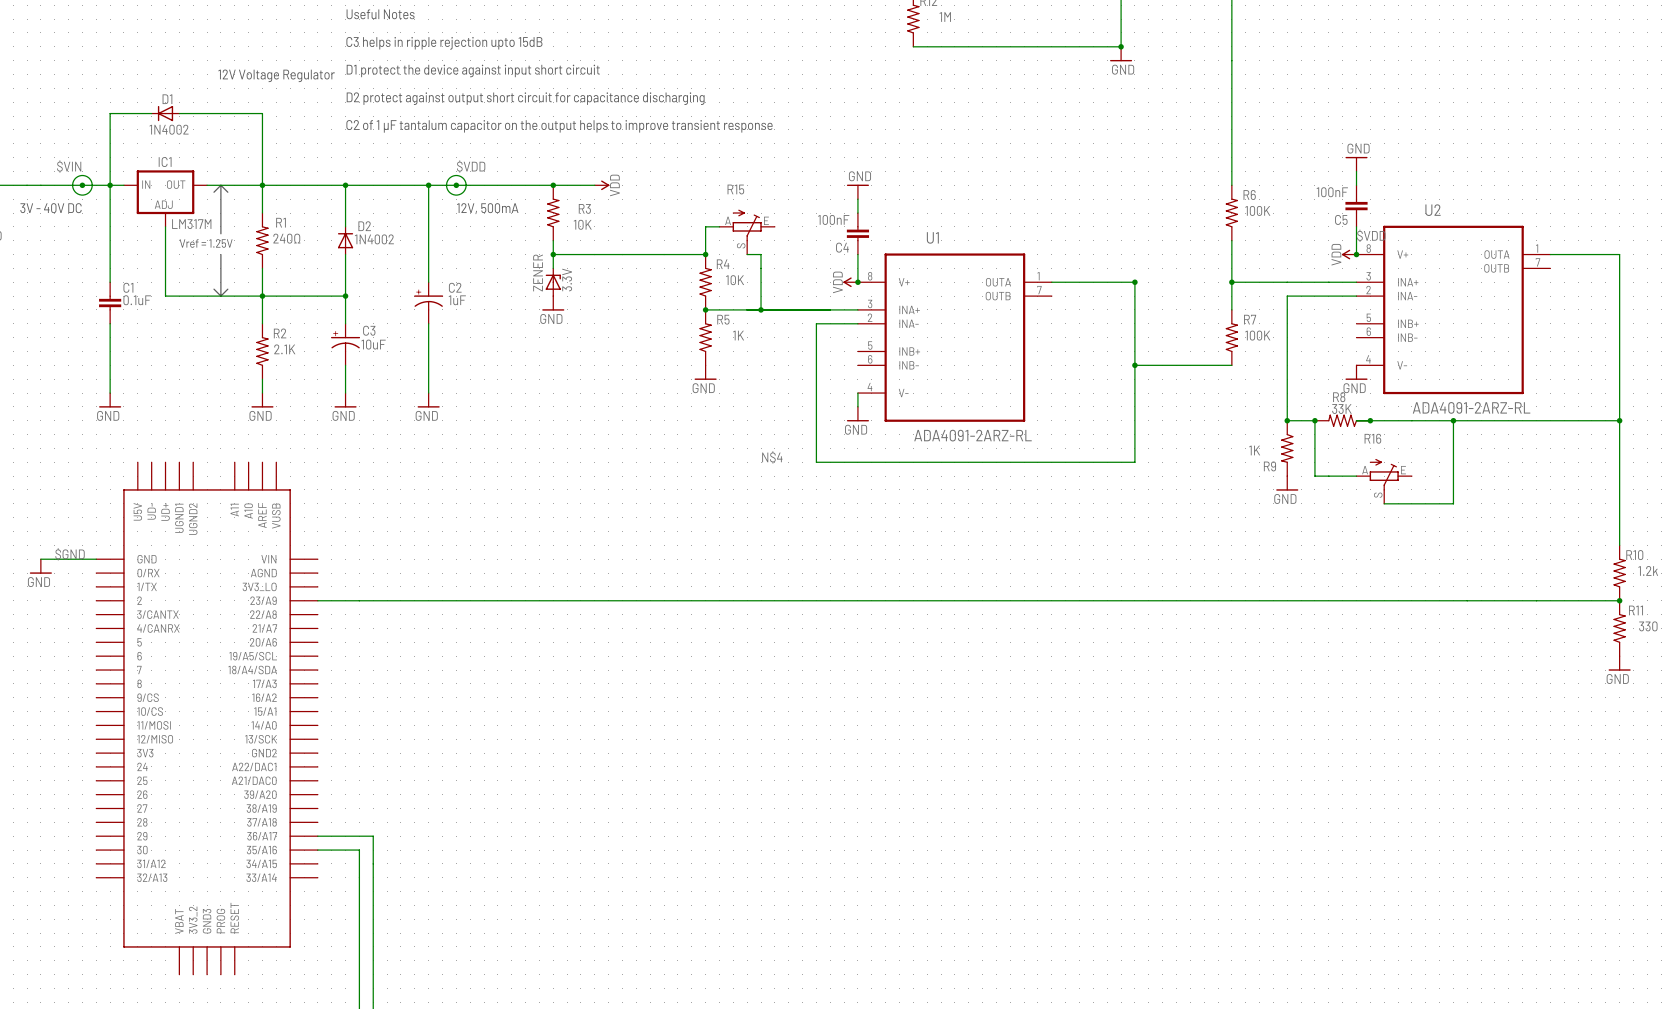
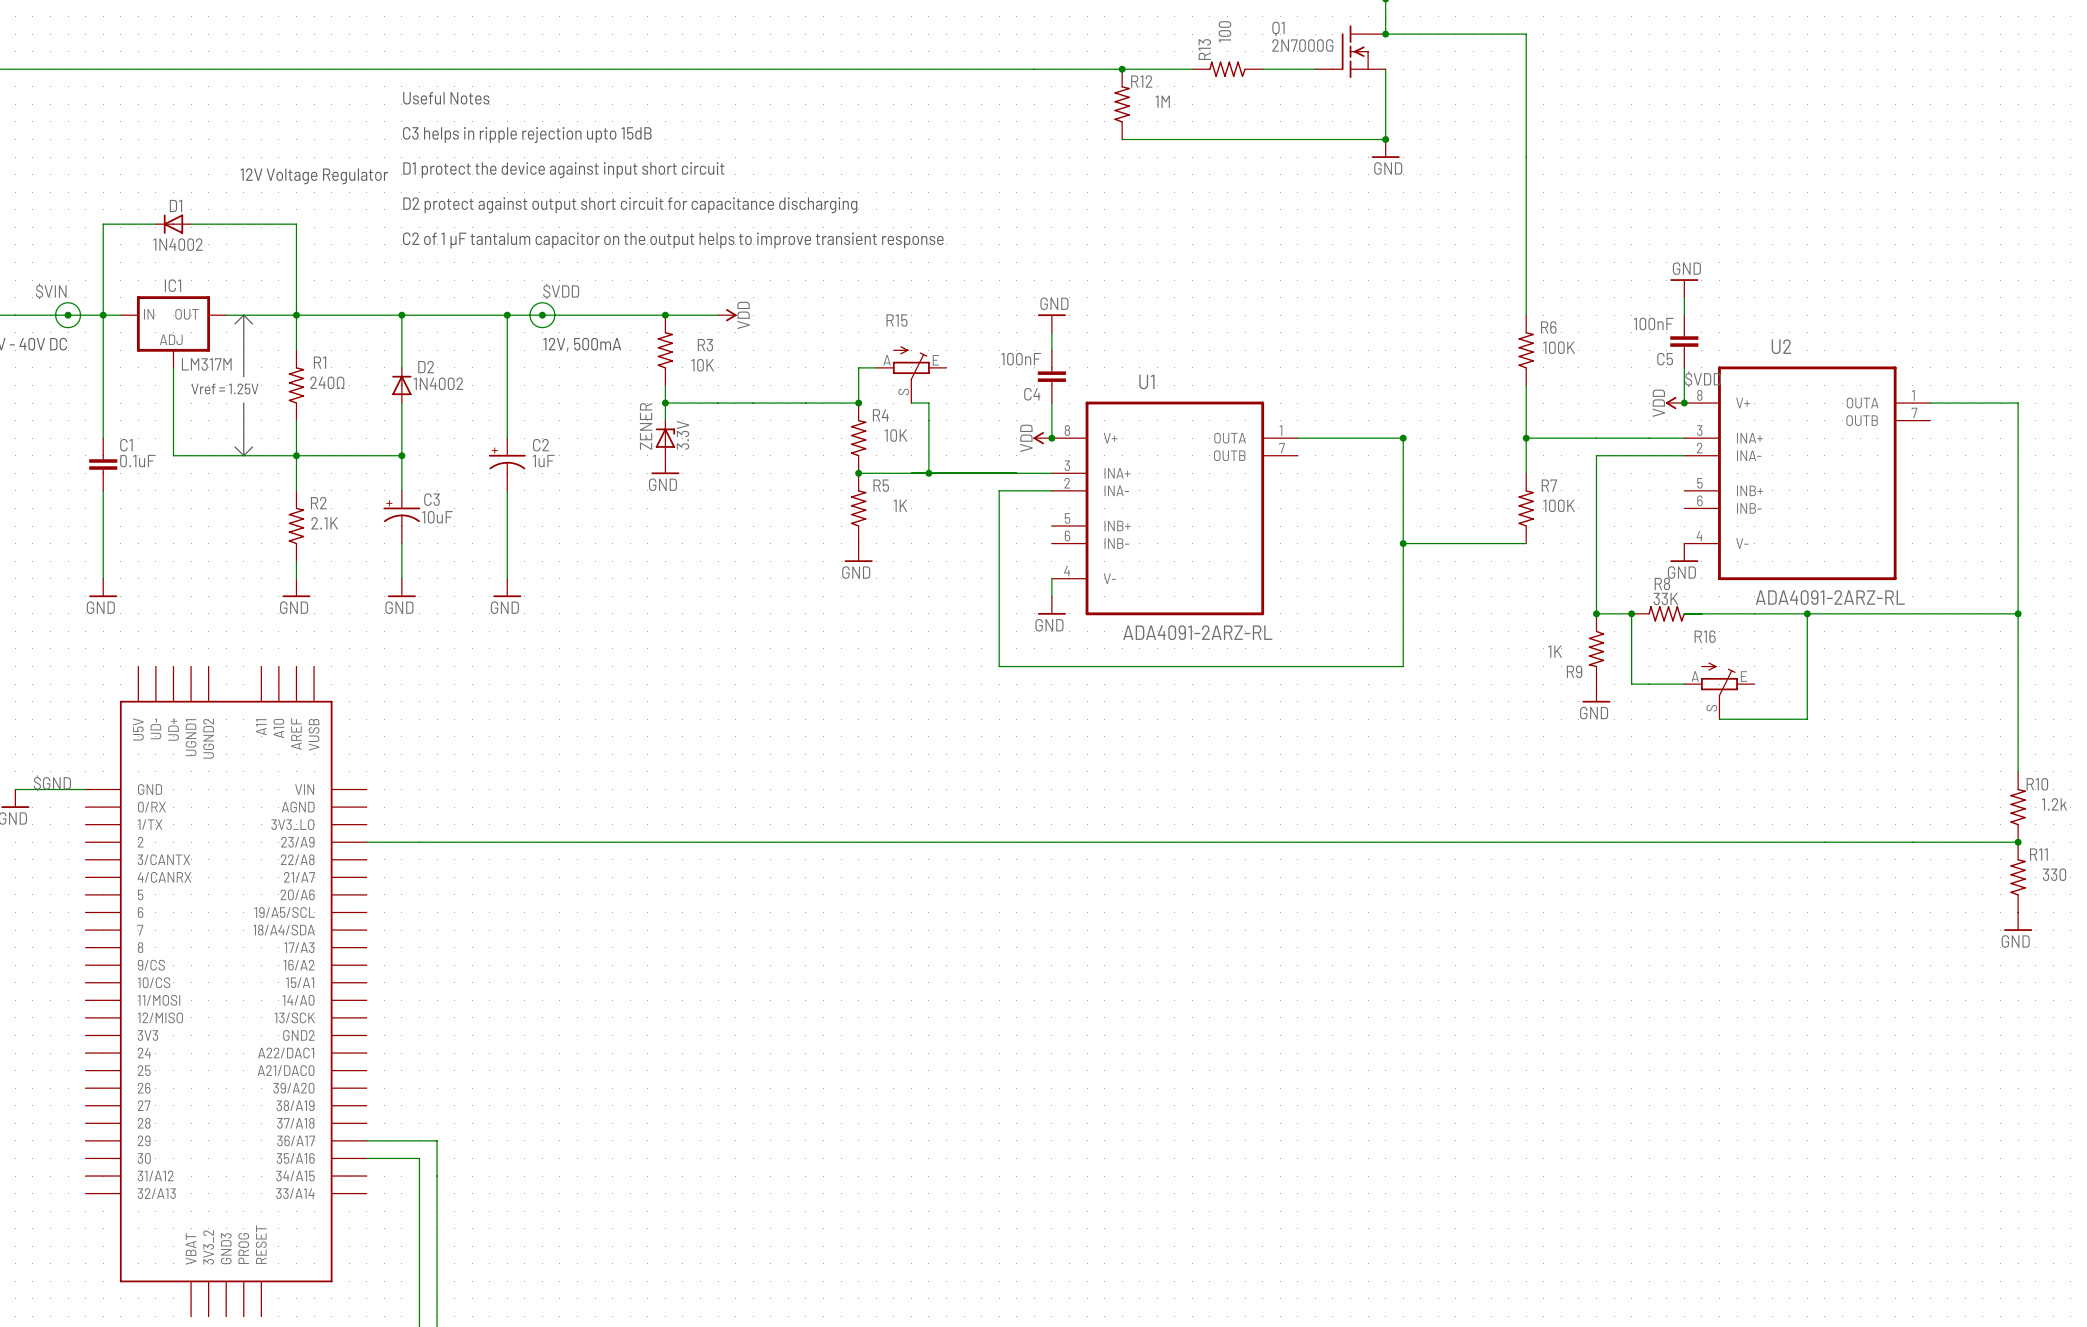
junction: (1370, 420) -> none
label: N$4 (772, 457) -> none

